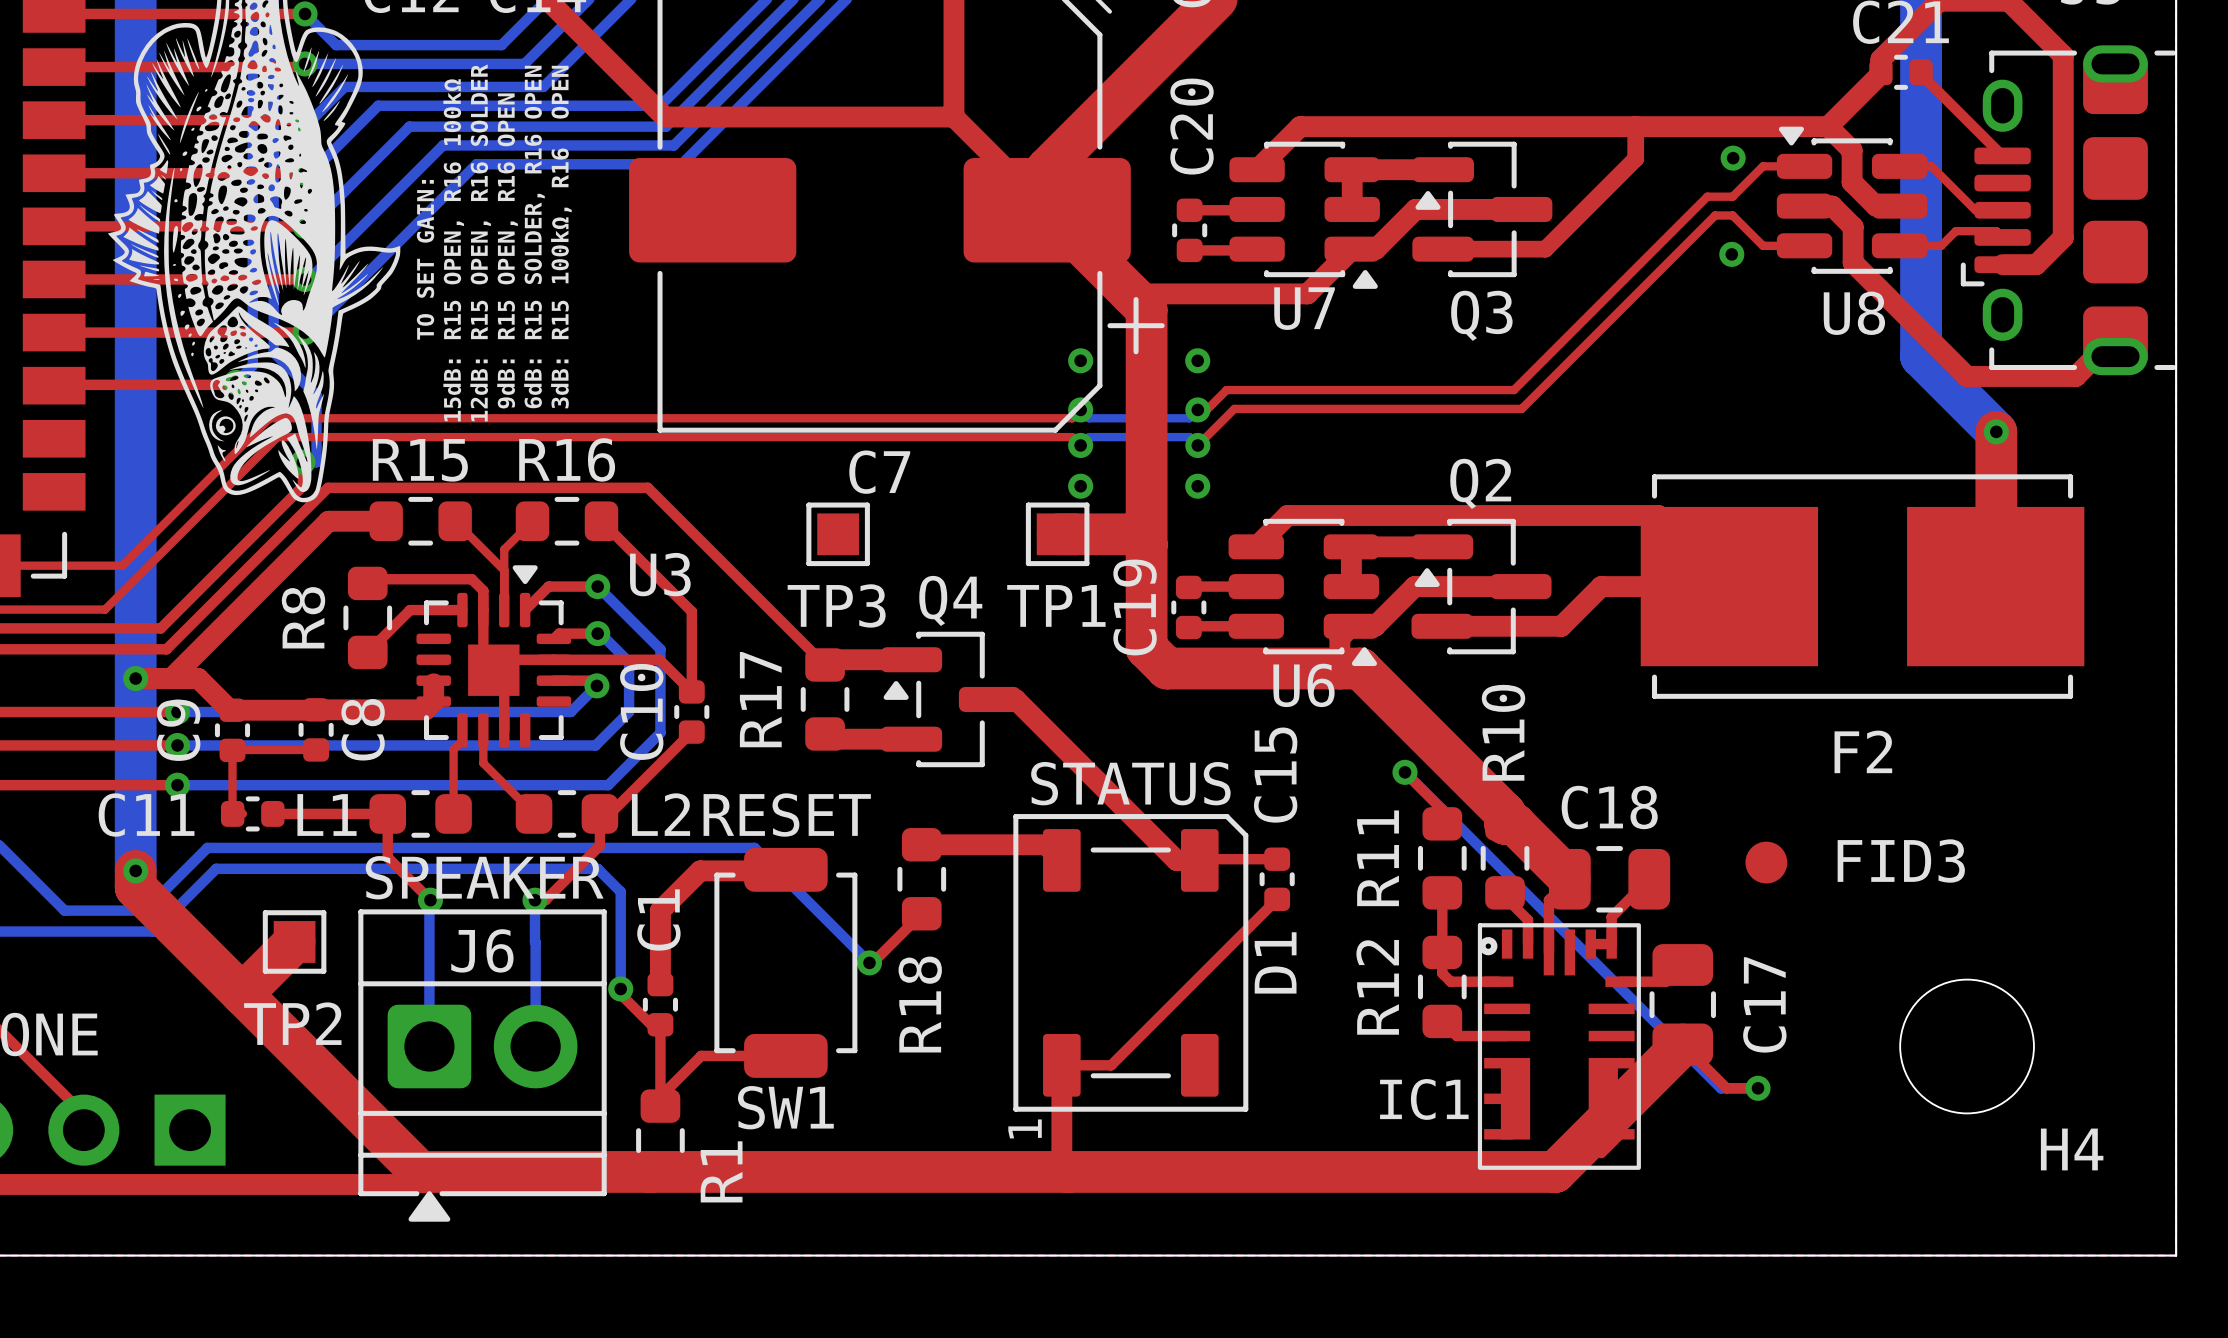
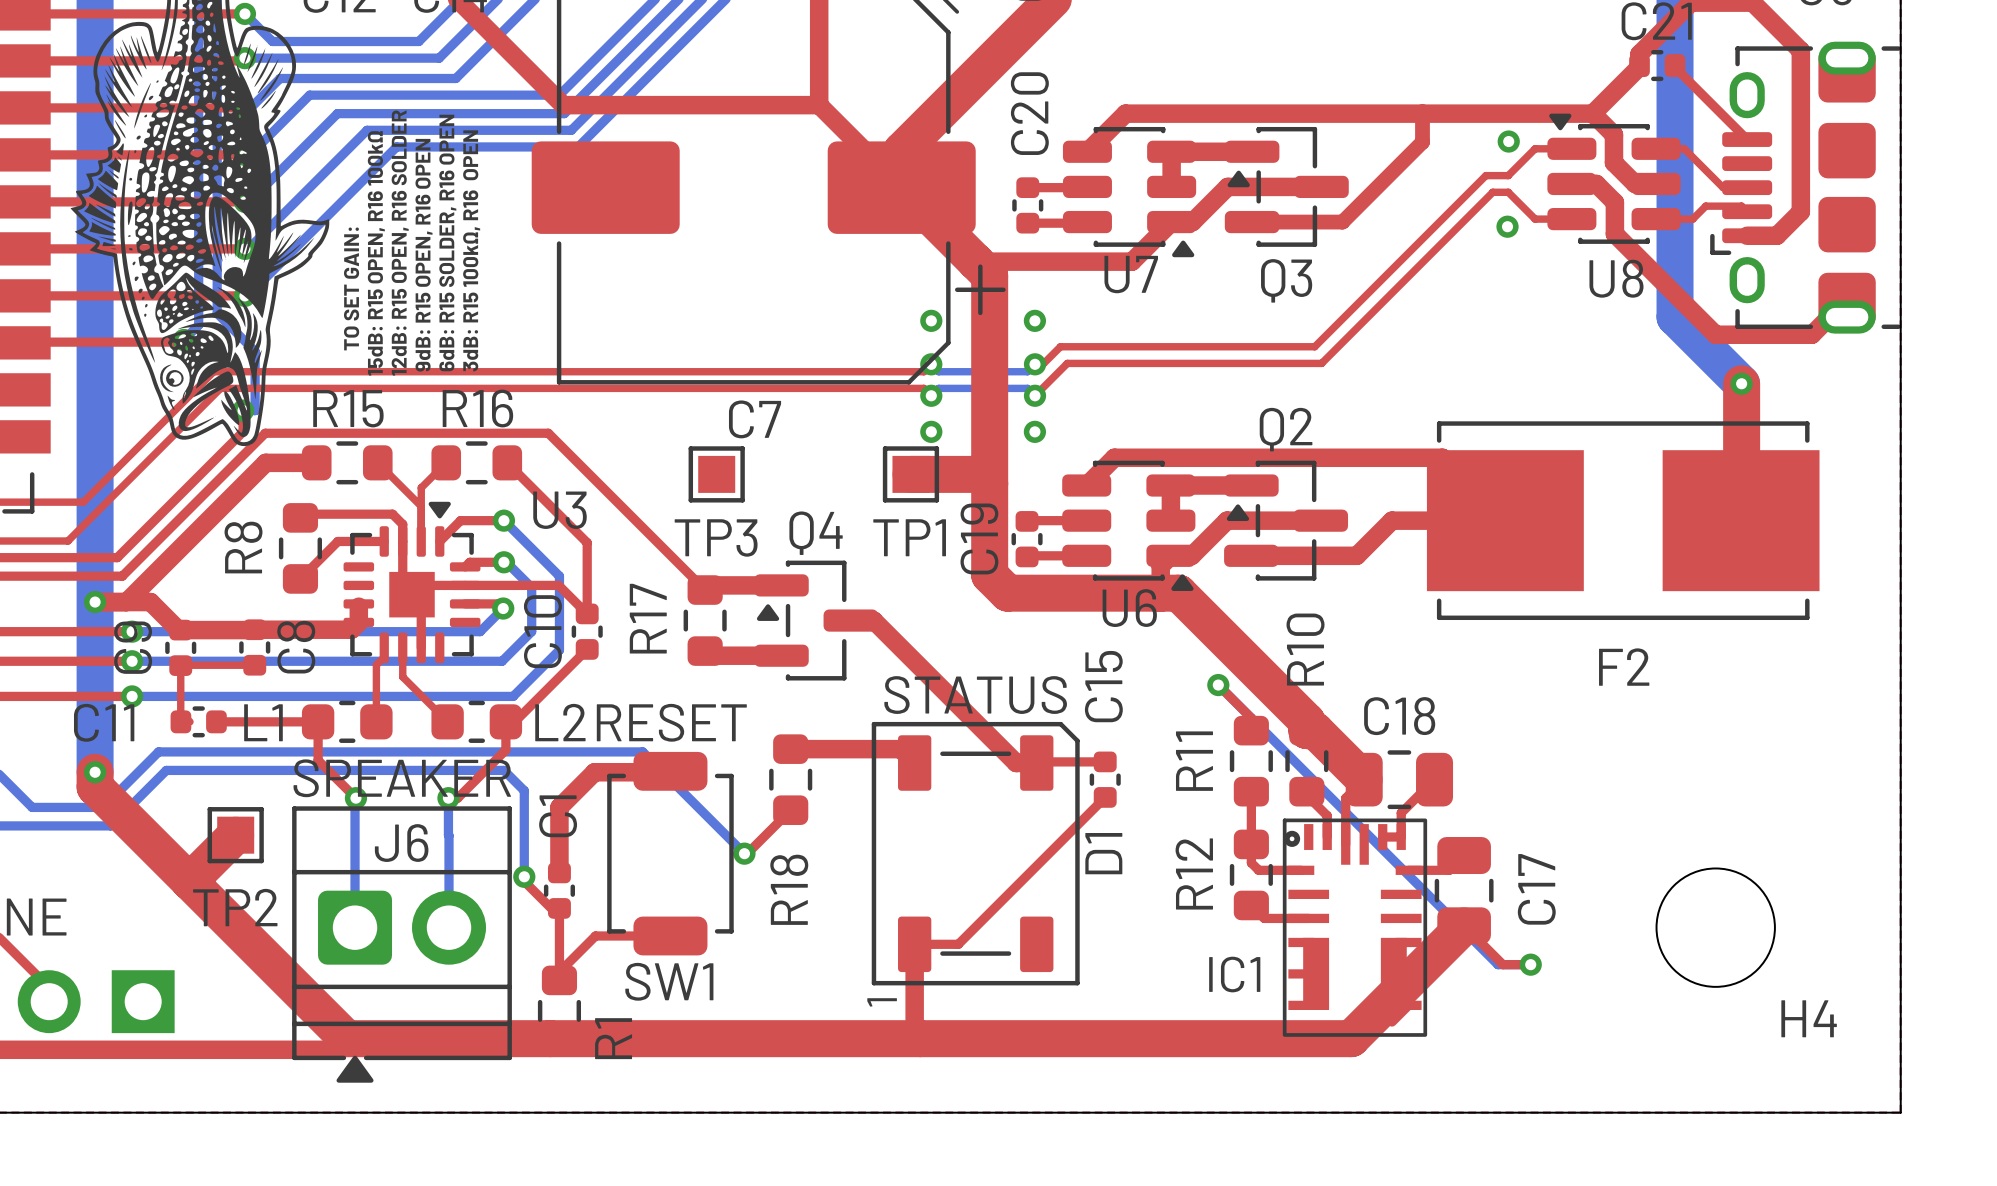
FID3: (1766, 862) -> none

